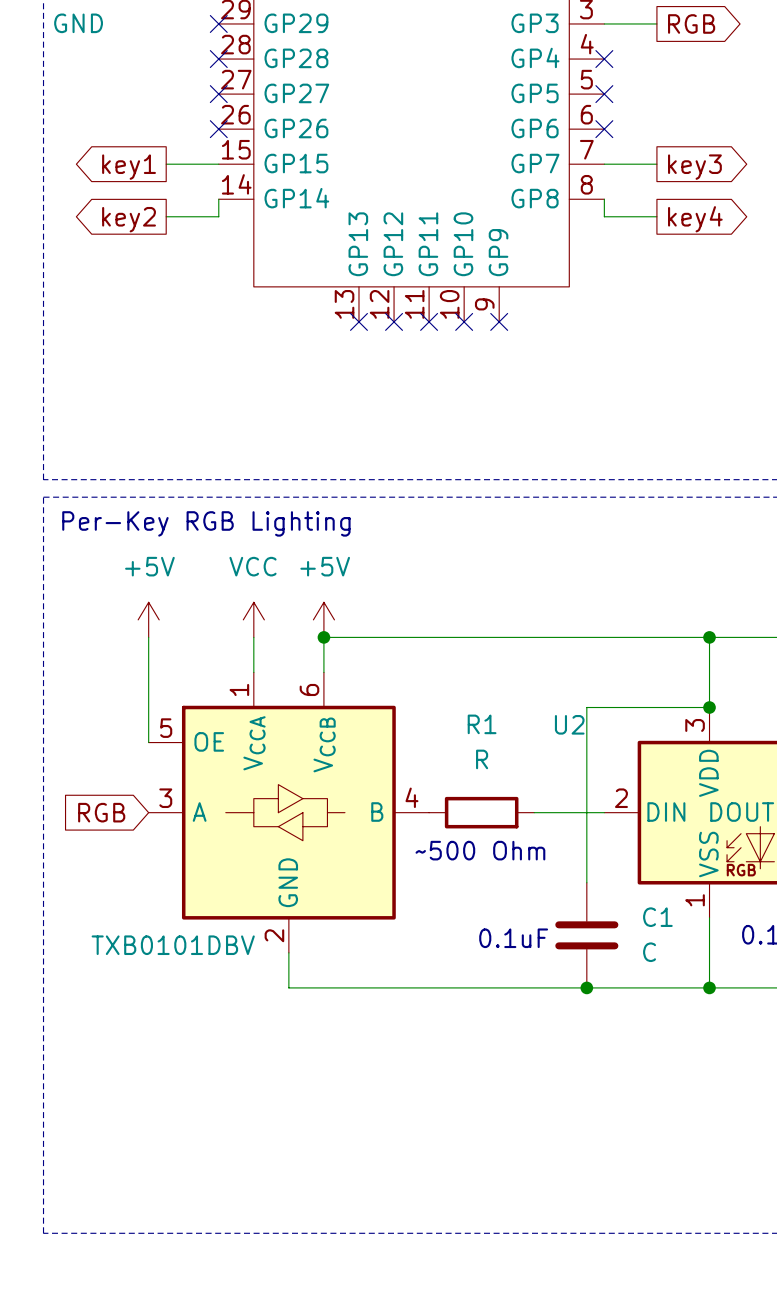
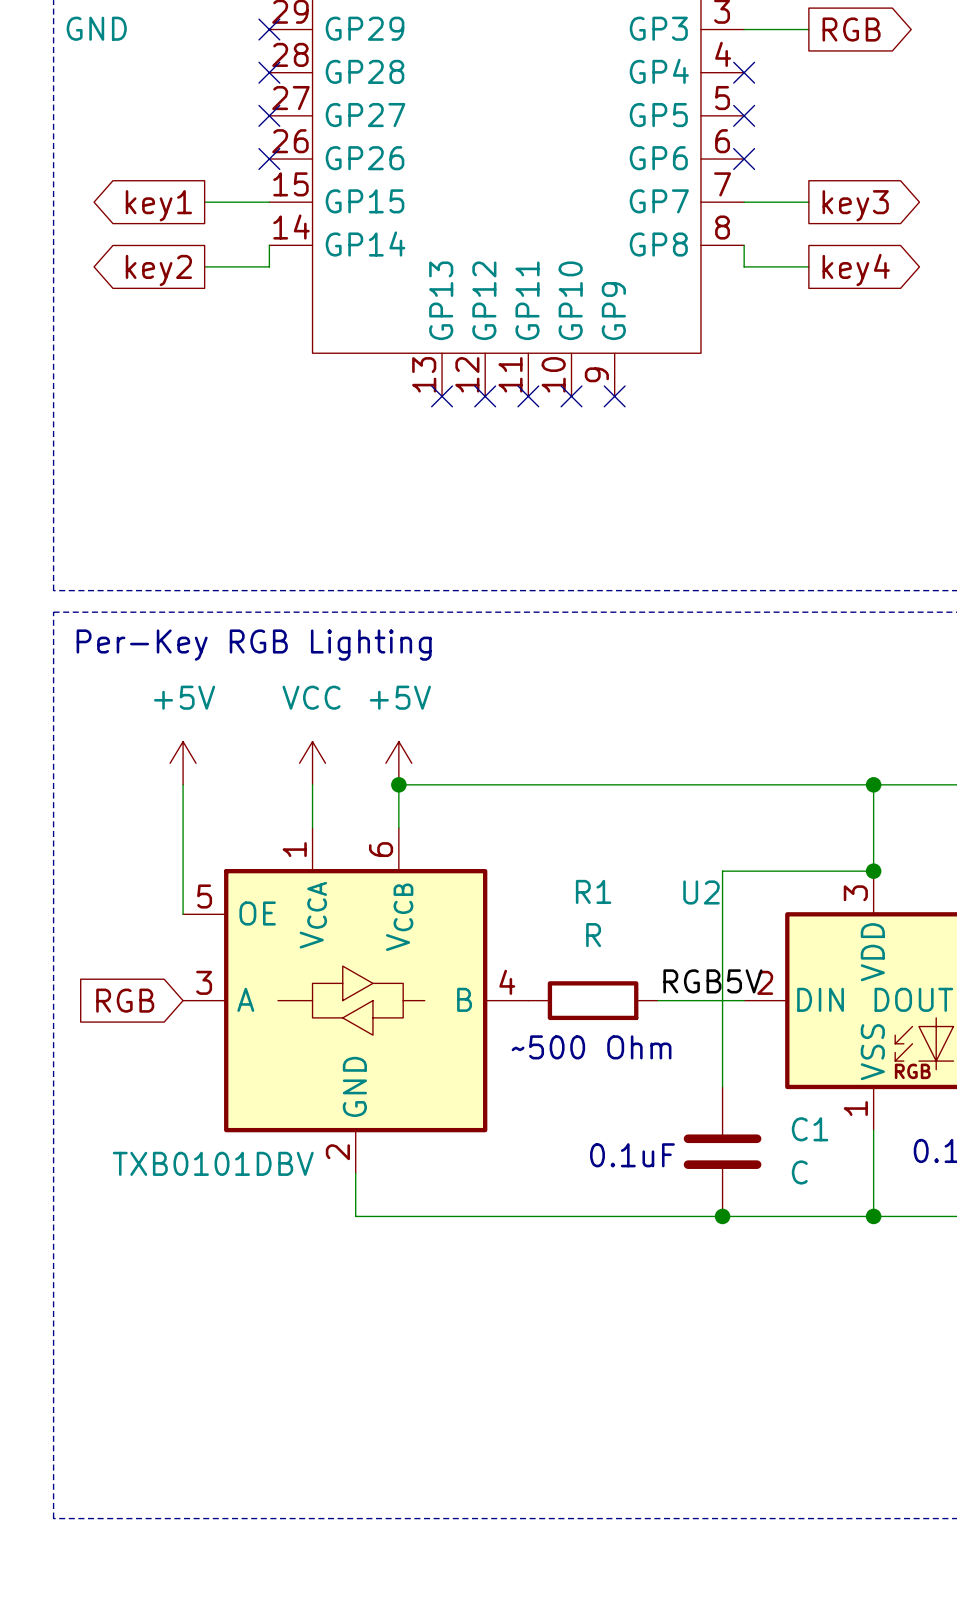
label: none -> RGB5V (712, 981)

